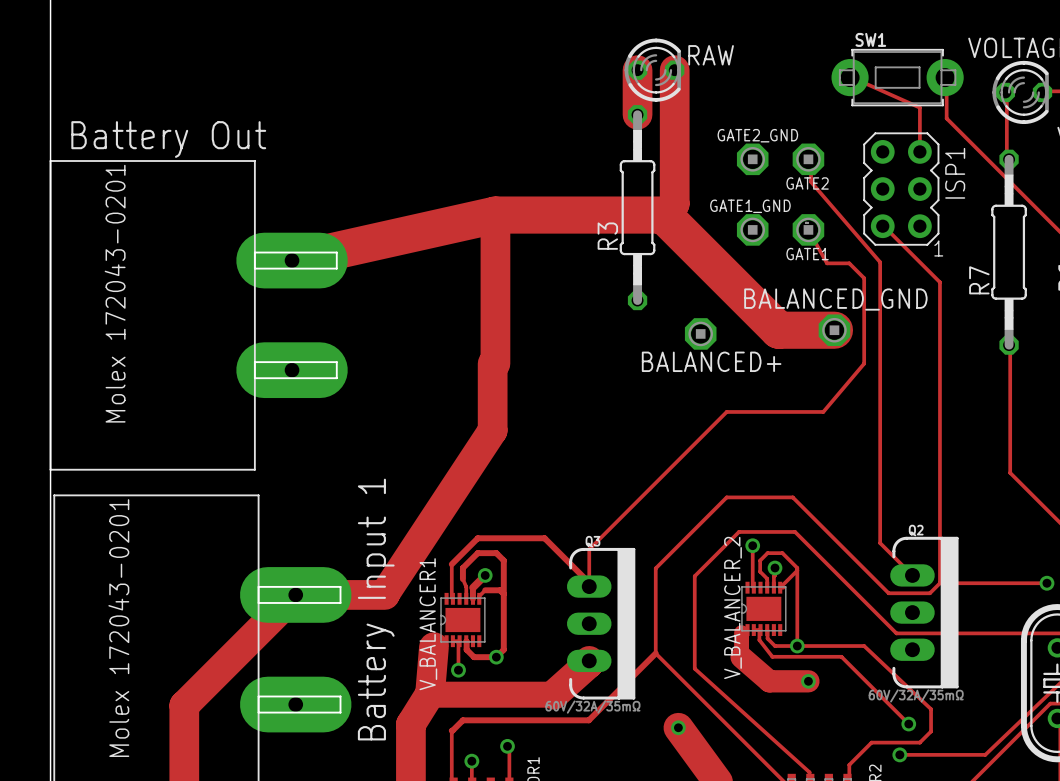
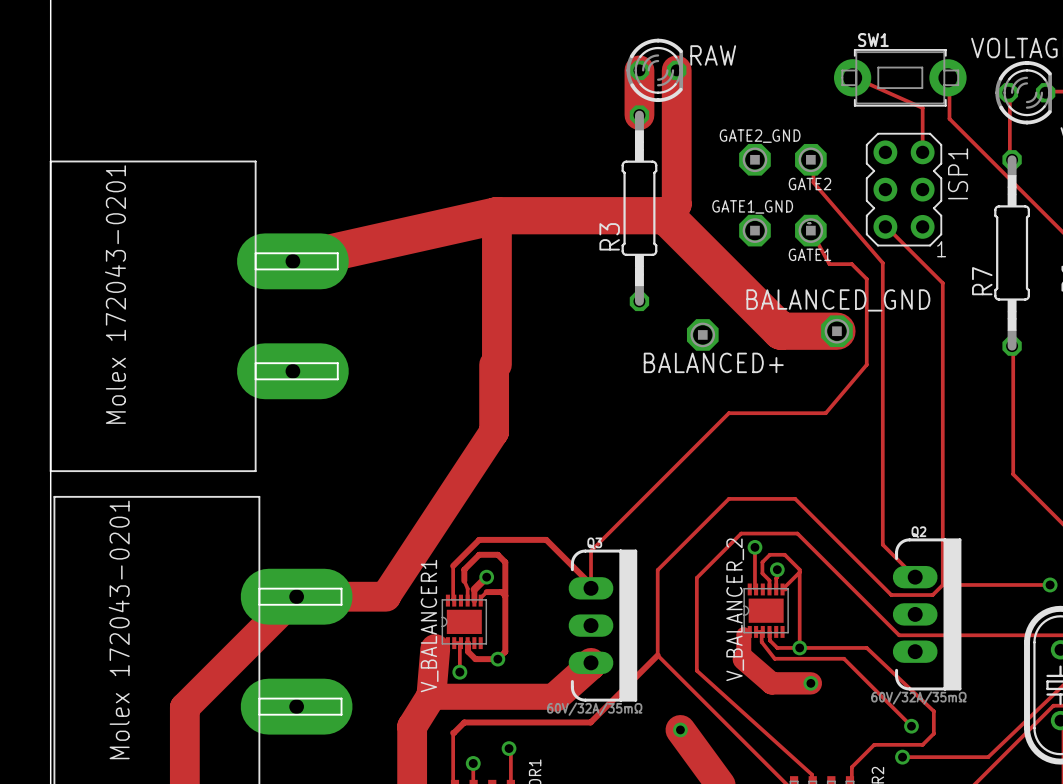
text: Battery Out (168, 139) -> none
text: Battery Input 1 (376, 609) -> none

